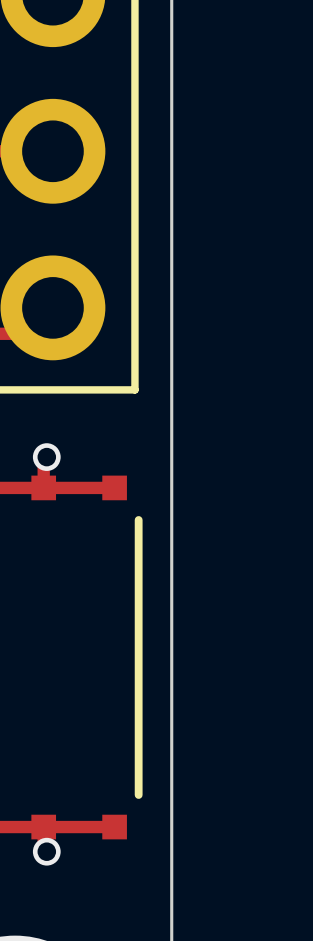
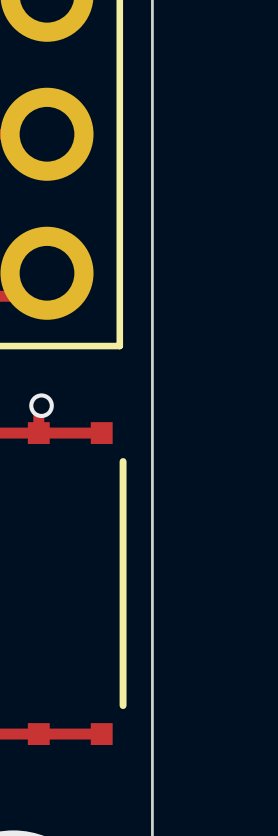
via: (46, 851) -> none

